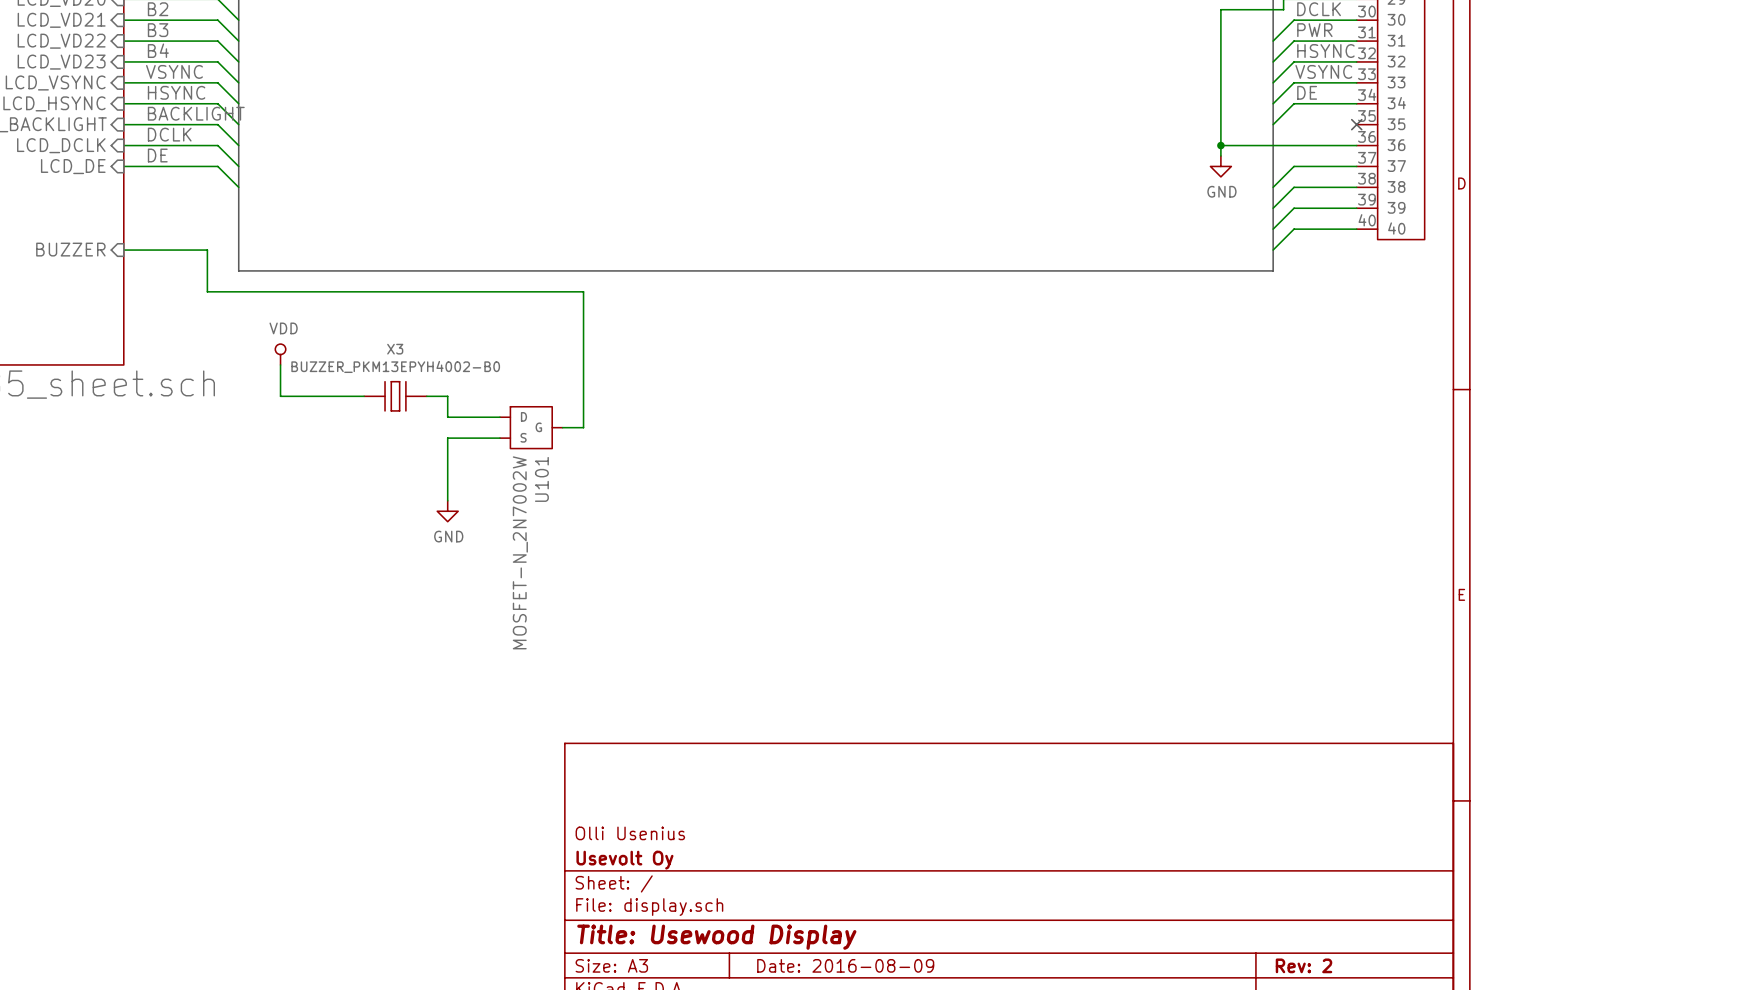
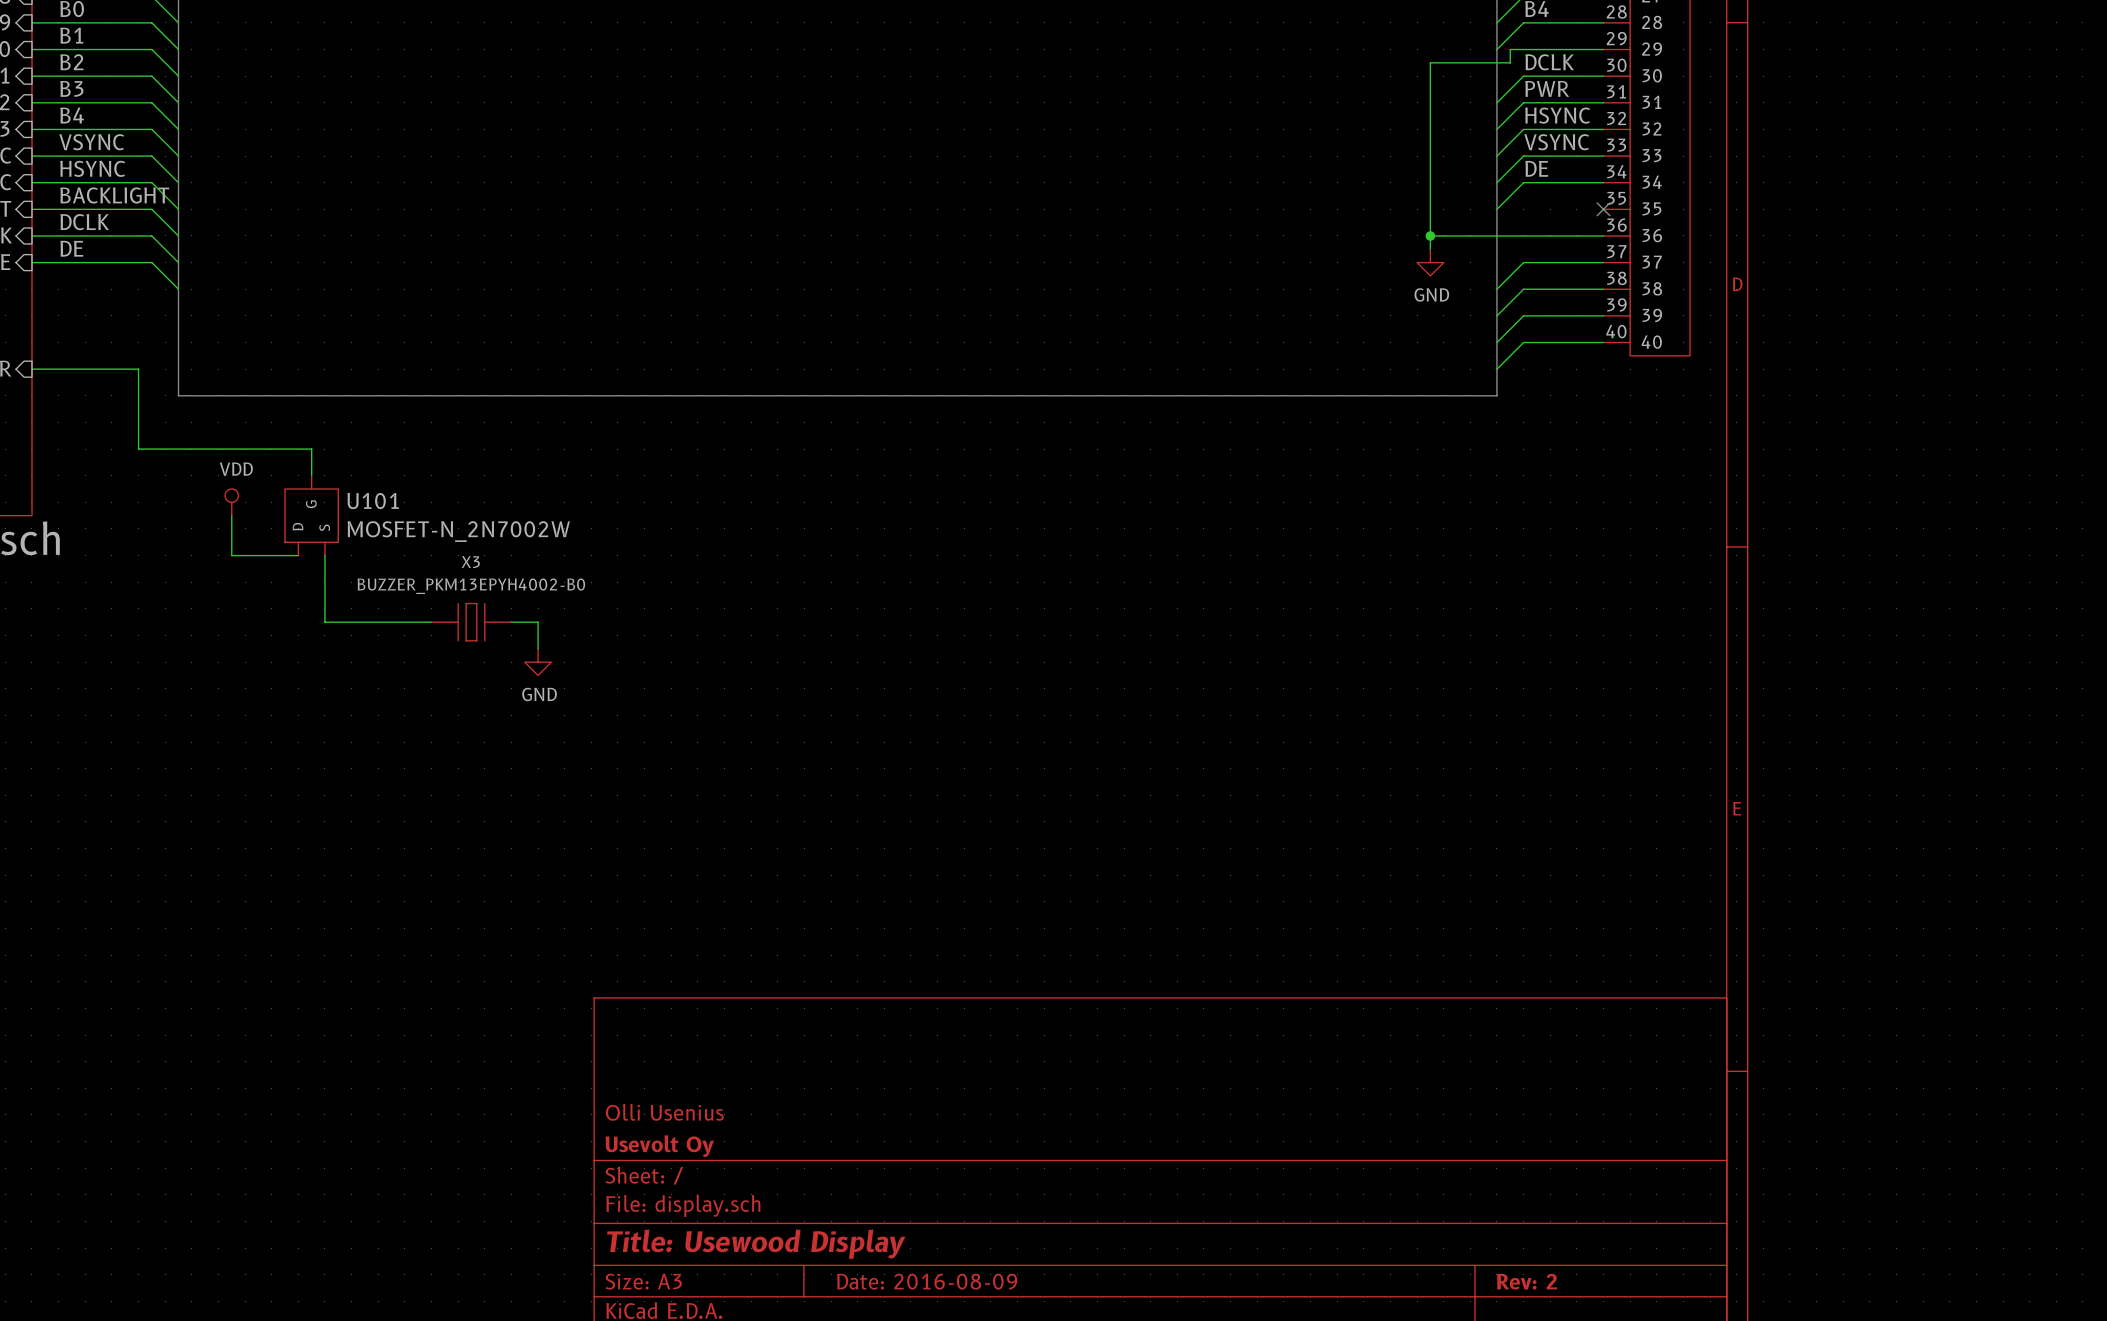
wire: (207, 291) (583, 291) (583, 427) (562, 427) -> (138, 422) (138, 449) (311, 449) (311, 475)
wire: (332, 396) (364, 396) -> none
wire: none -> (324, 555) (324, 622) (431, 622)
X3 position: (395, 396) -> (471, 622)
wire: (426, 396) (447, 396) (447, 417) (499, 417) -> none
U101 rotation: 0° (531, 427) -> 90° counterclockwise (311, 515)
U101 position: (531, 427) -> (311, 515)
wire: (499, 438) (447, 438) (447, 500) -> none
wire: none -> (511, 622) (538, 622) (538, 648)
power symbol position: GND (447, 511) -> GND (538, 662)

